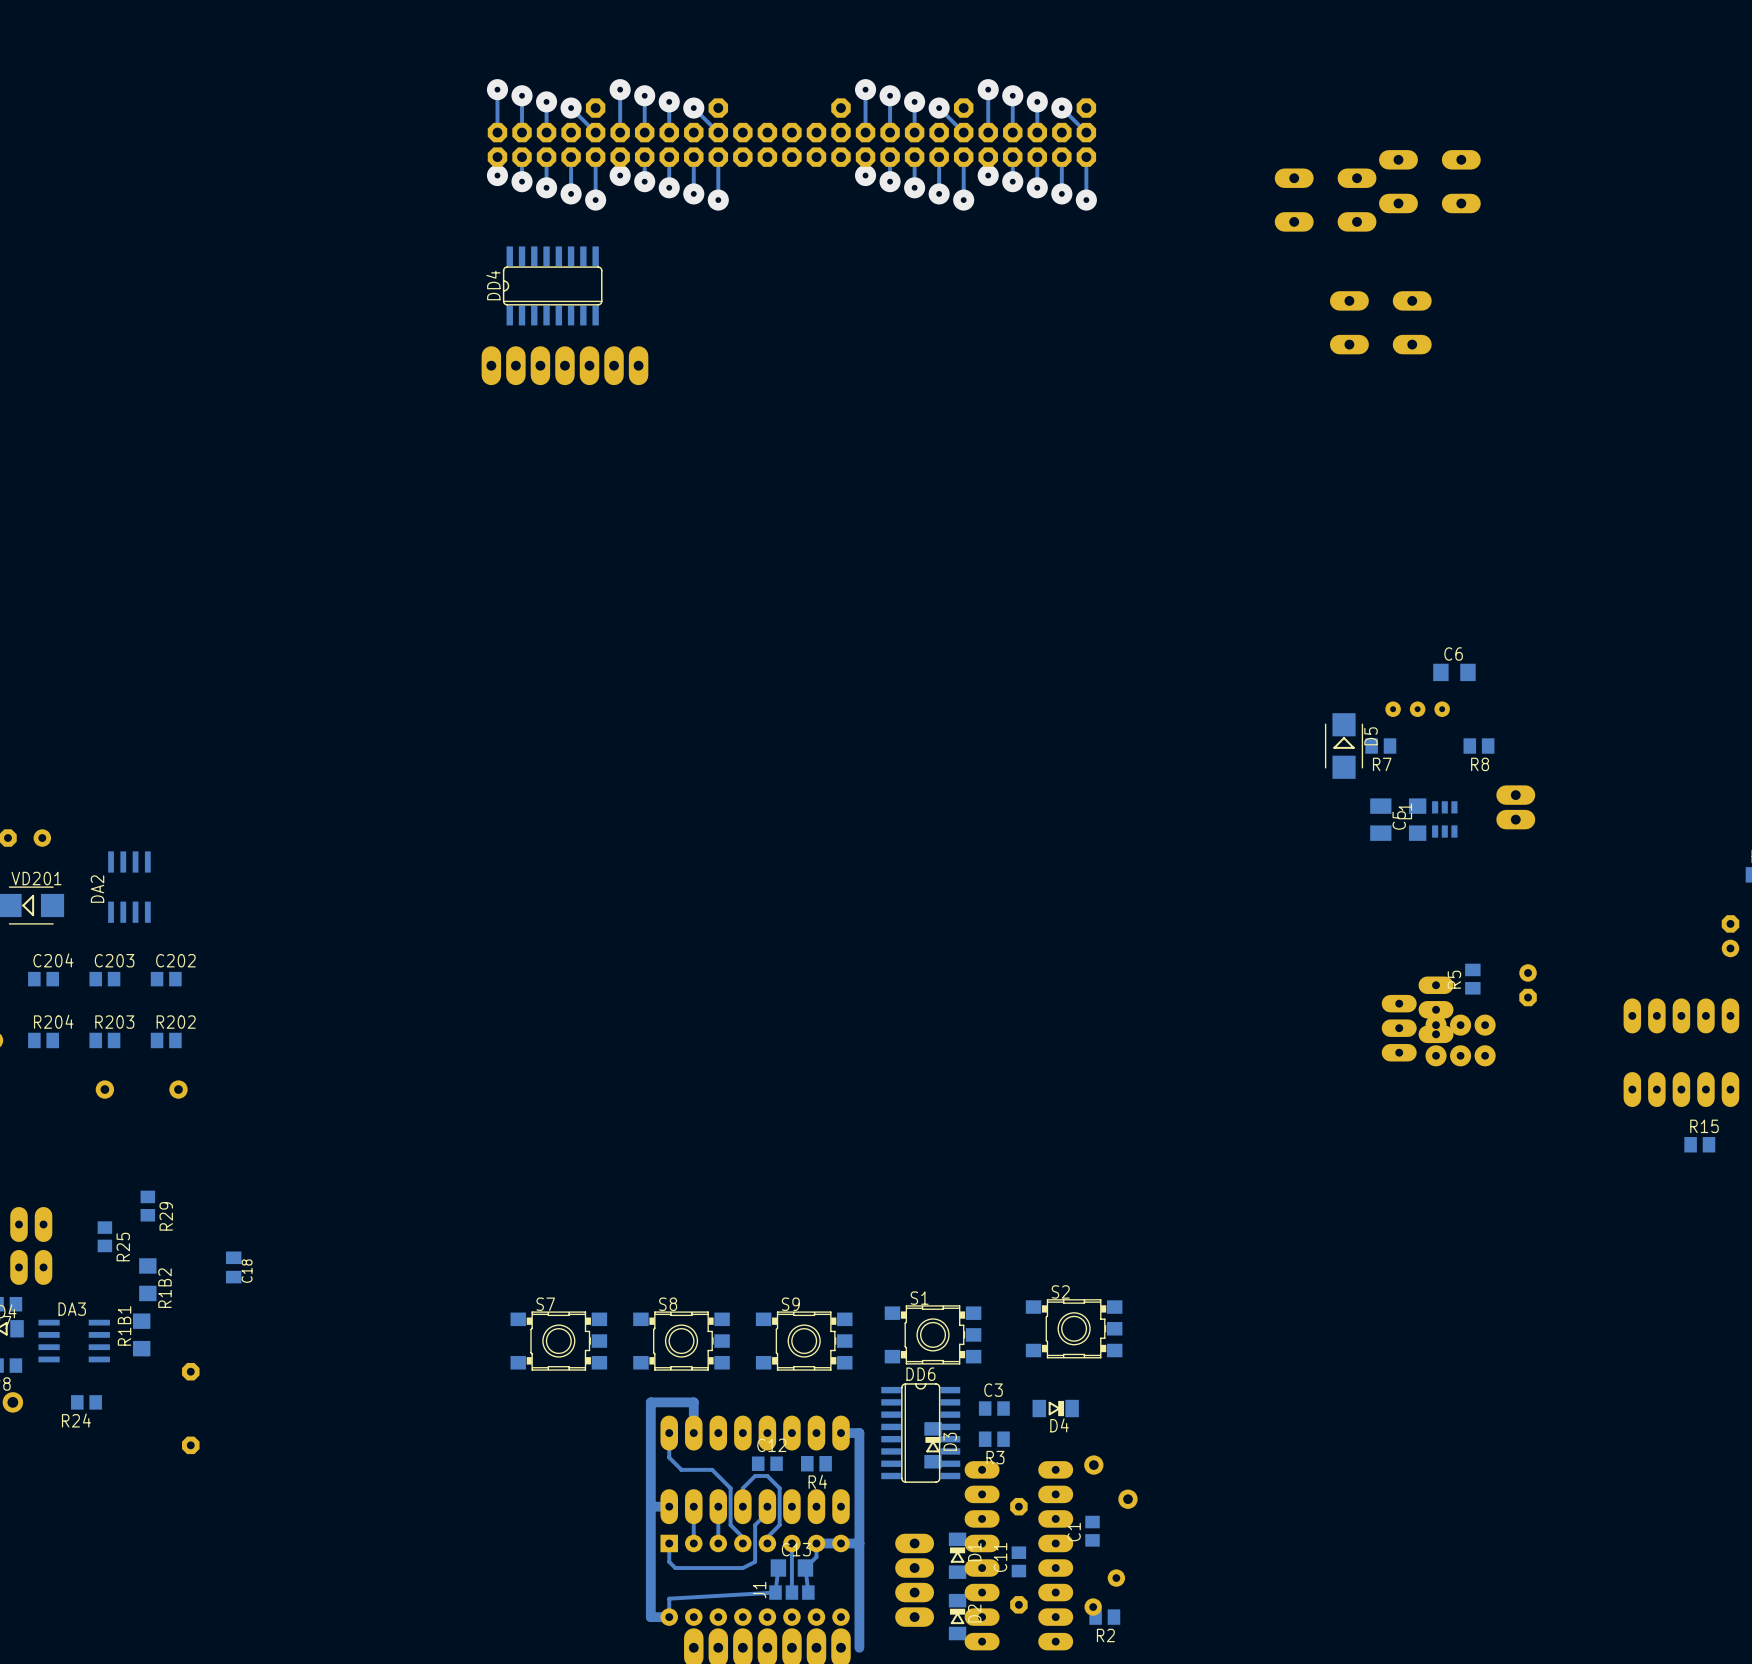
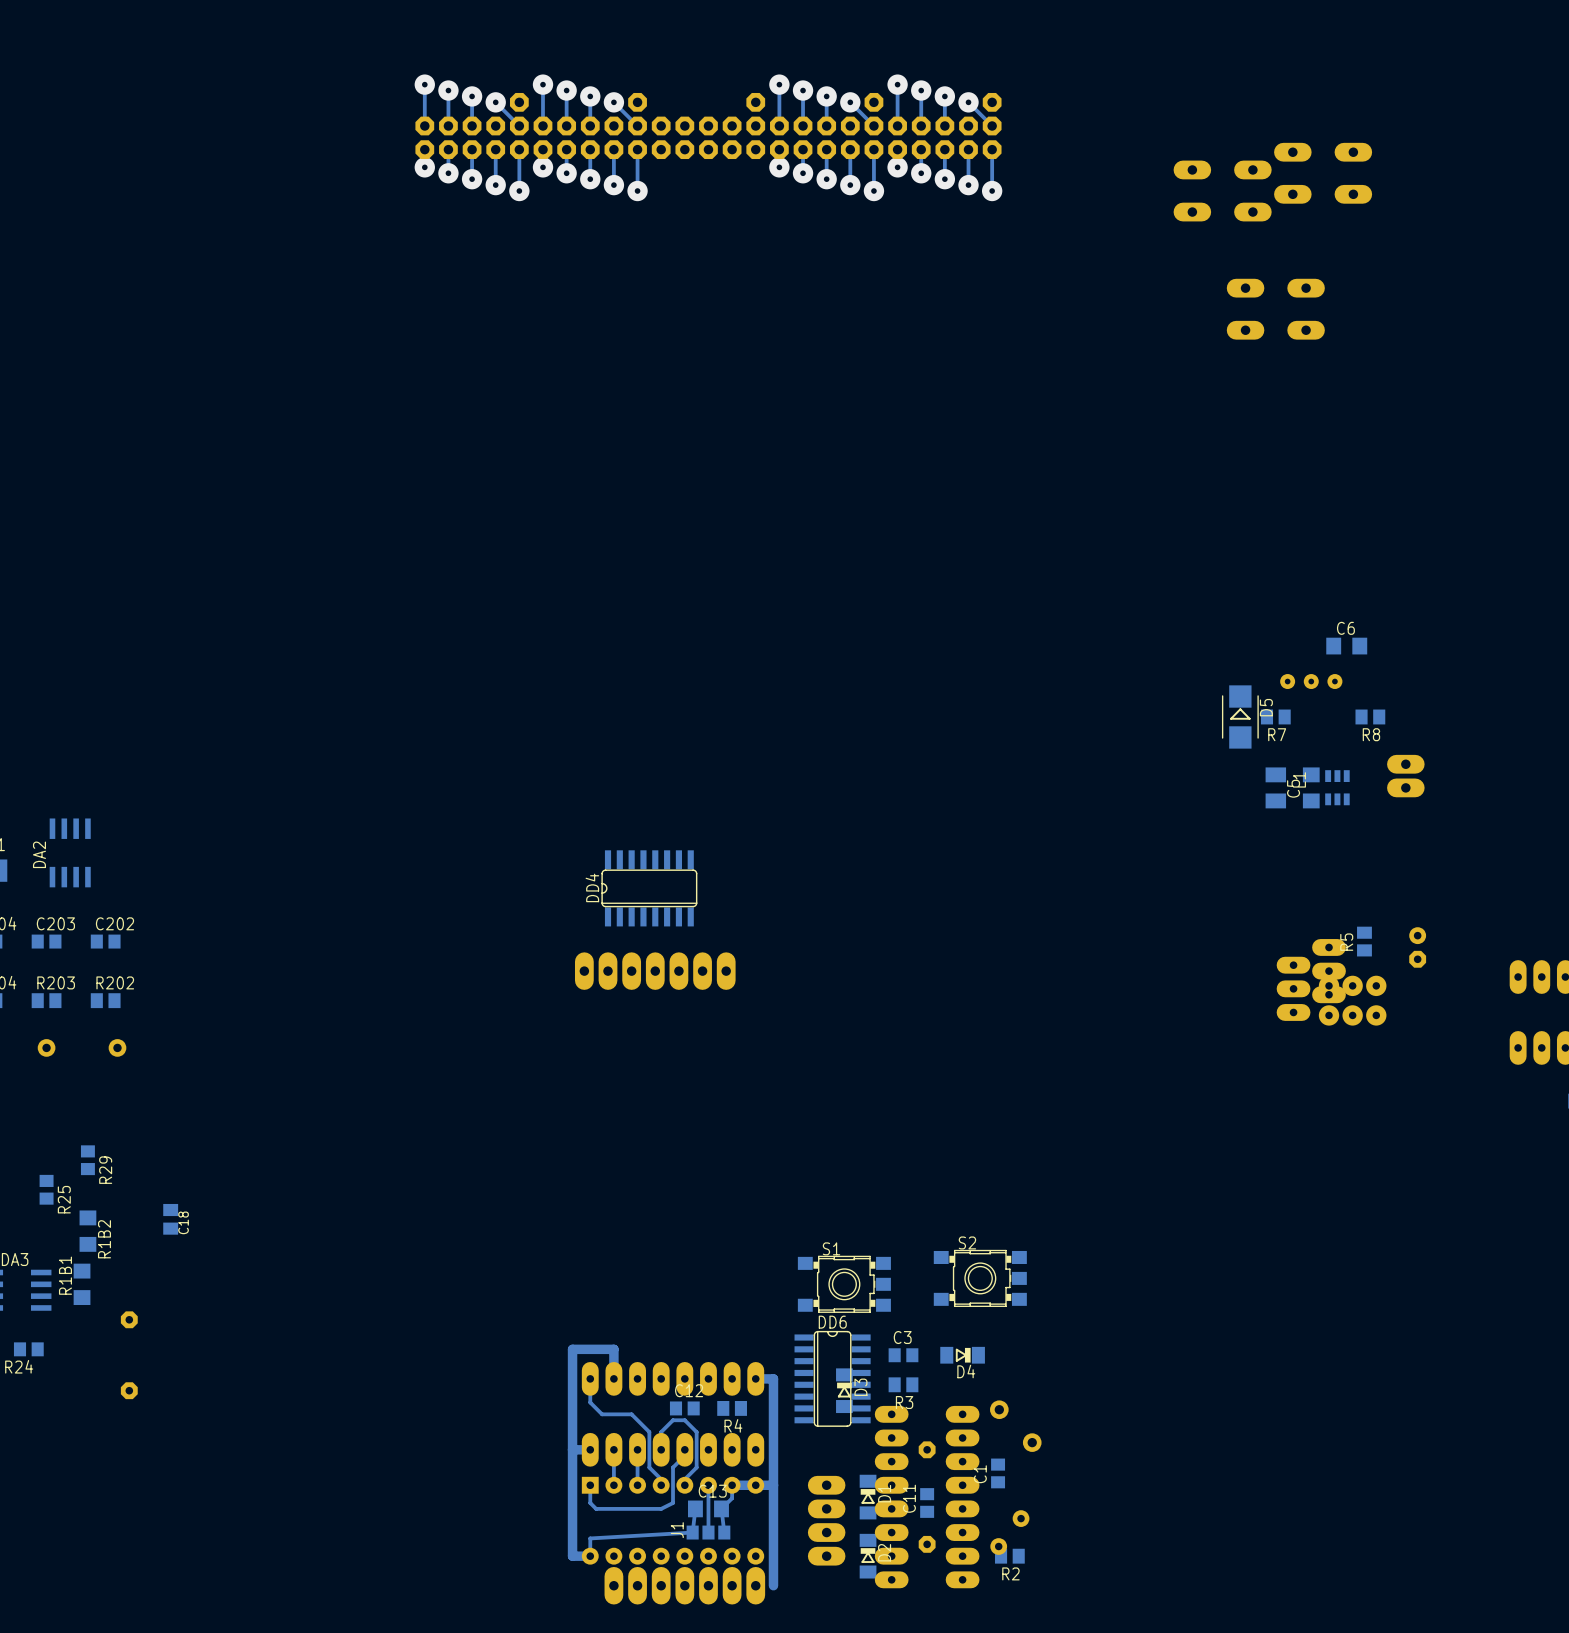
DD4 position: (552, 285) -> (649, 888)
part: (564, 365) -> none
part: none -> (655, 971)
S7: (558, 1341) -> none
S8: (681, 1341) -> none
S9: (804, 1341) -> none

